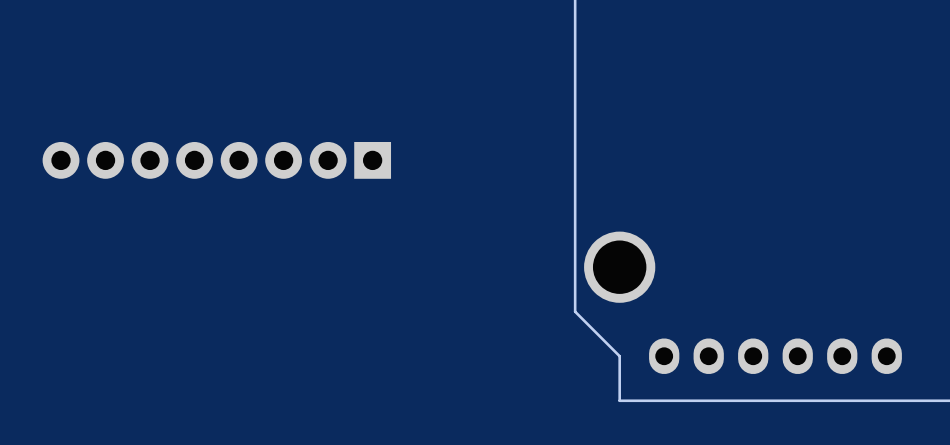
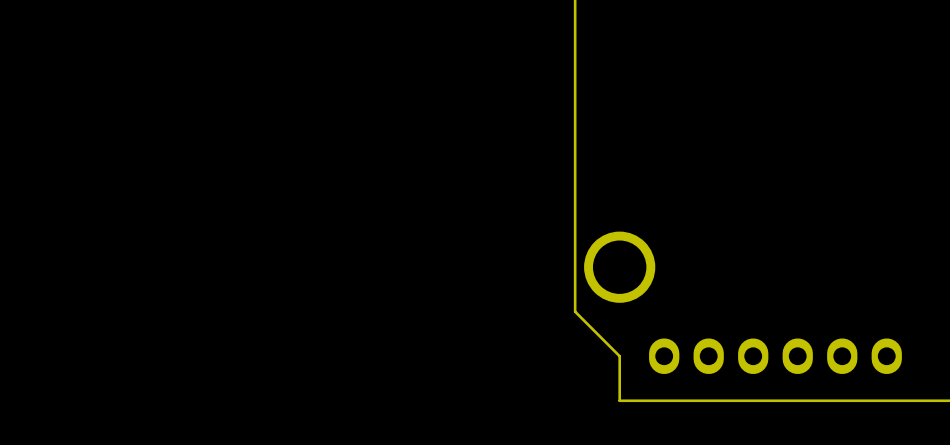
part: (216, 160) -> none

